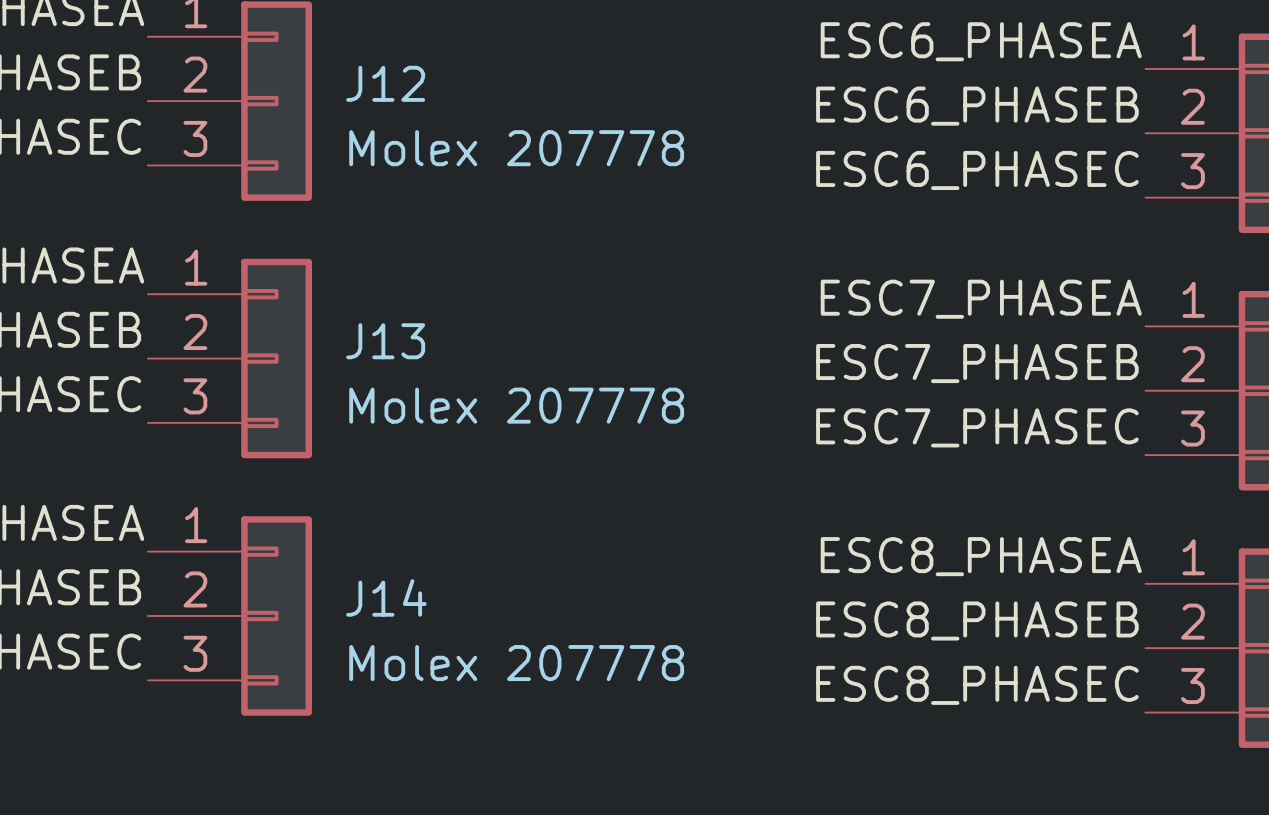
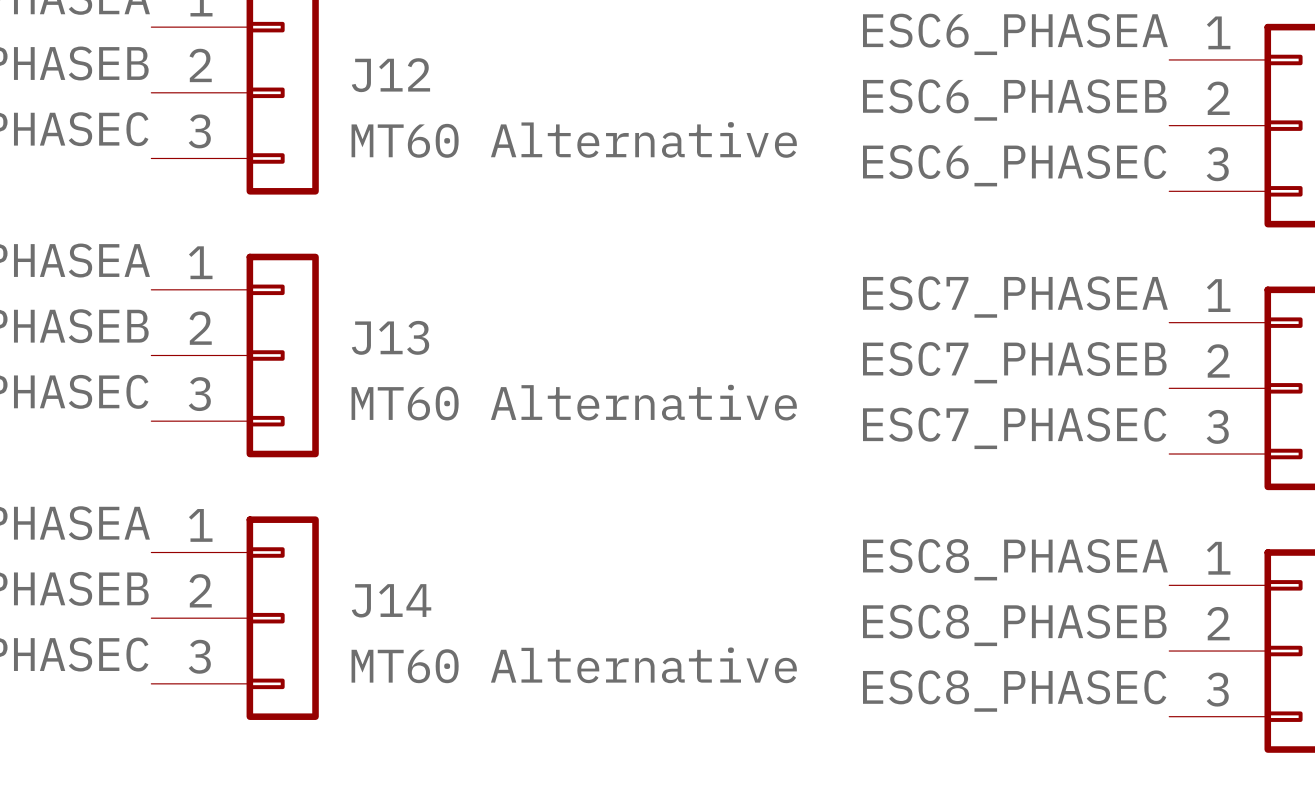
J12 value: Molex 207778 (516, 148) -> MT60 Alternative (574, 139)
J13 value: Molex 207778 (516, 405) -> MT60 Alternative (574, 402)
J14 value: Molex 207778 (516, 663) -> MT60 Alternative (574, 665)

